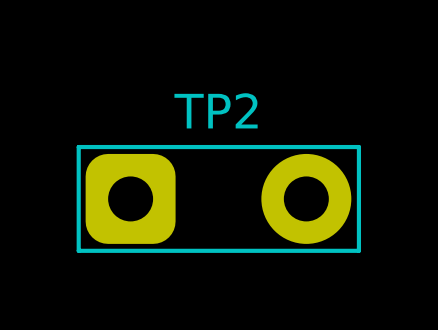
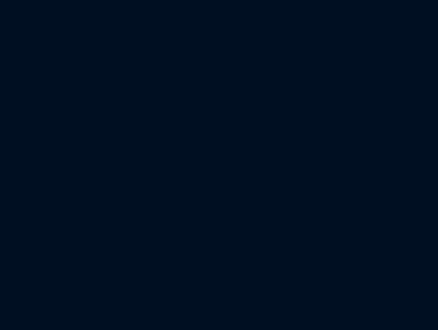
TP2: (218, 198) -> none

